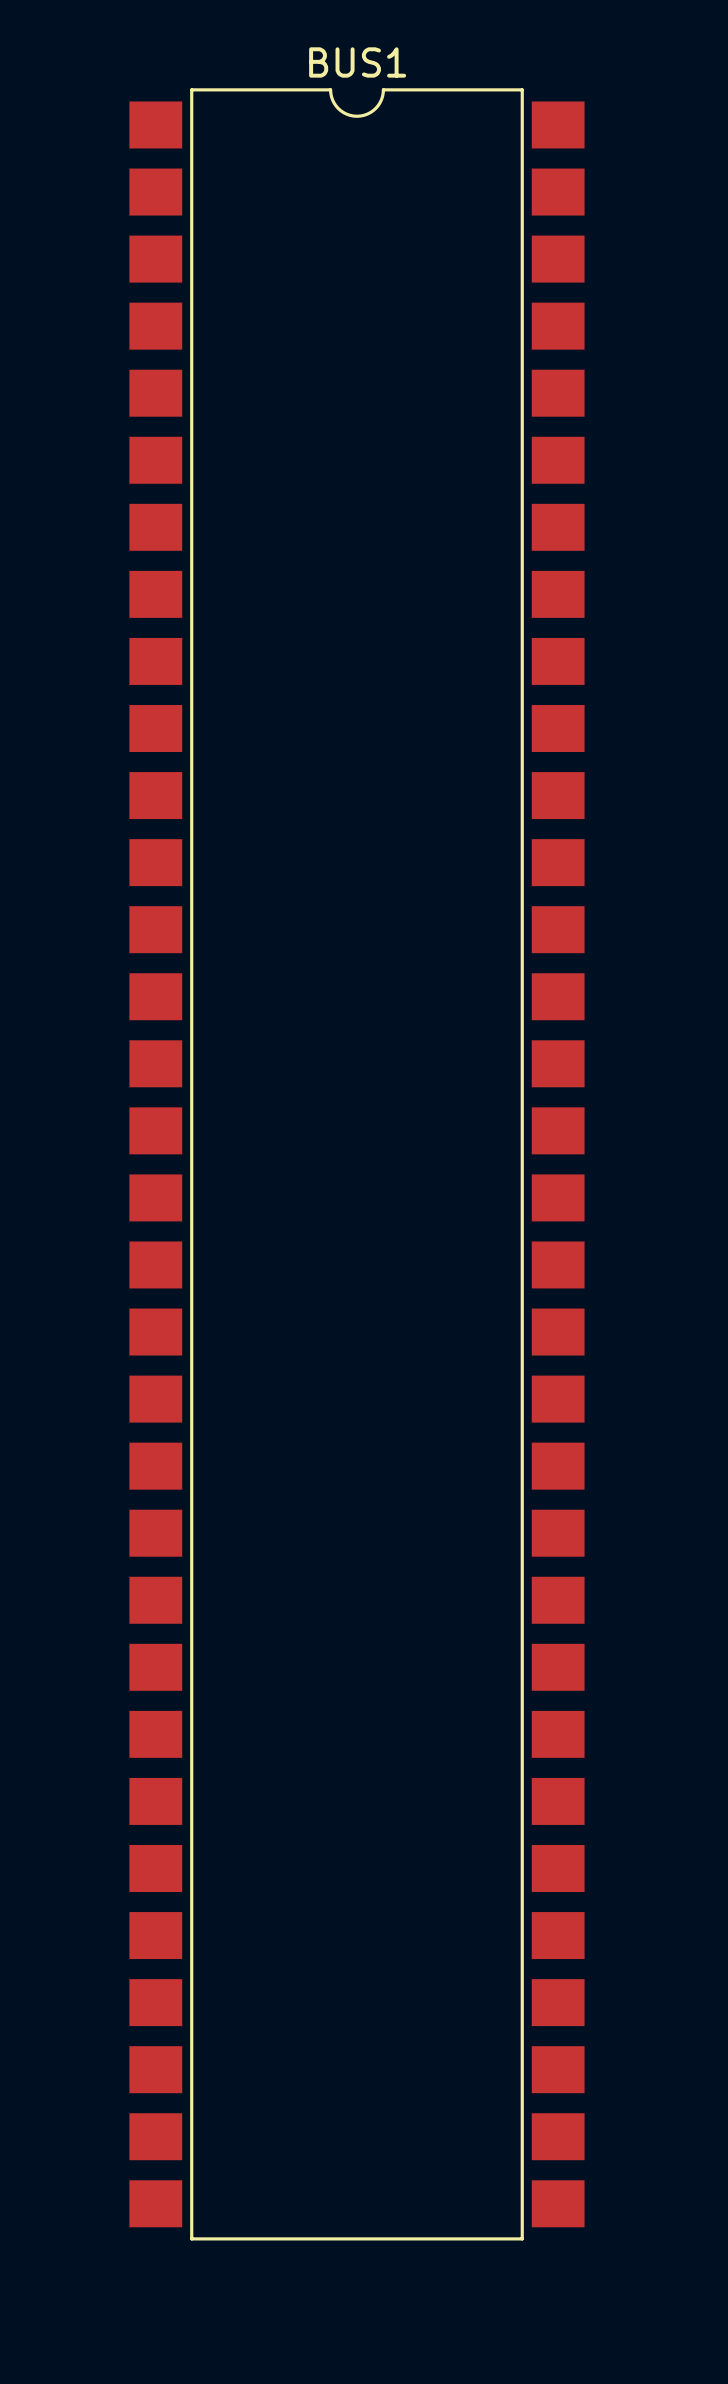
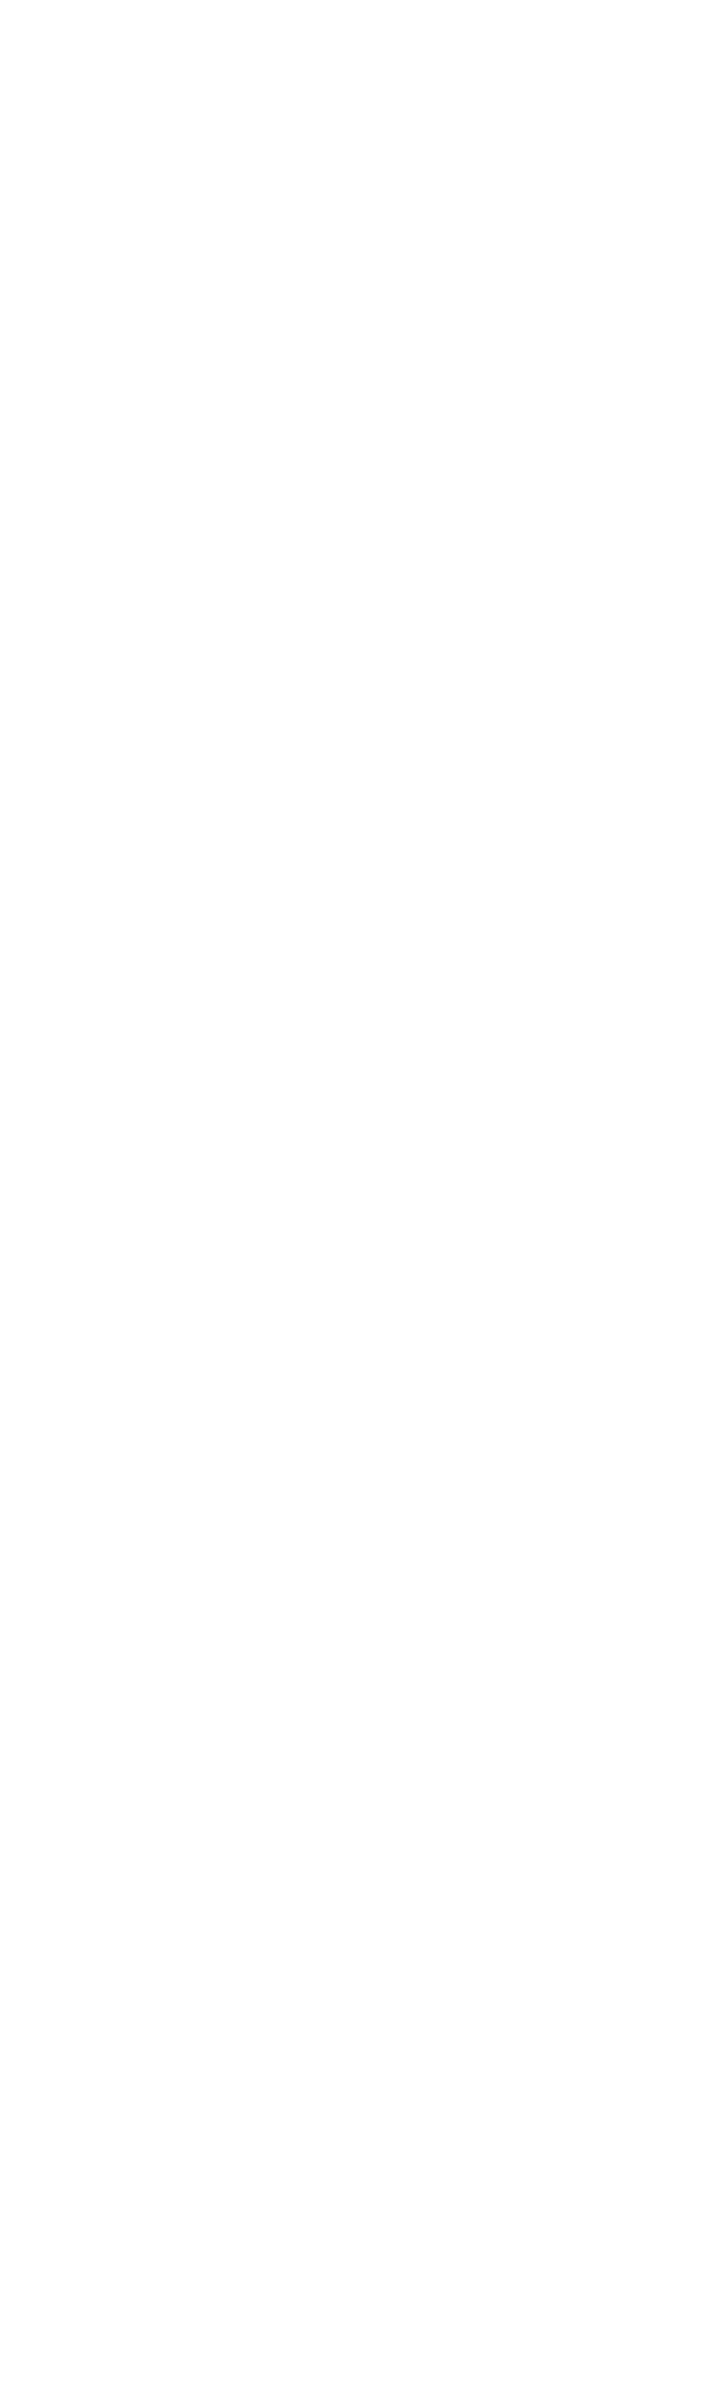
BUS1: (356, 1164) -> none

